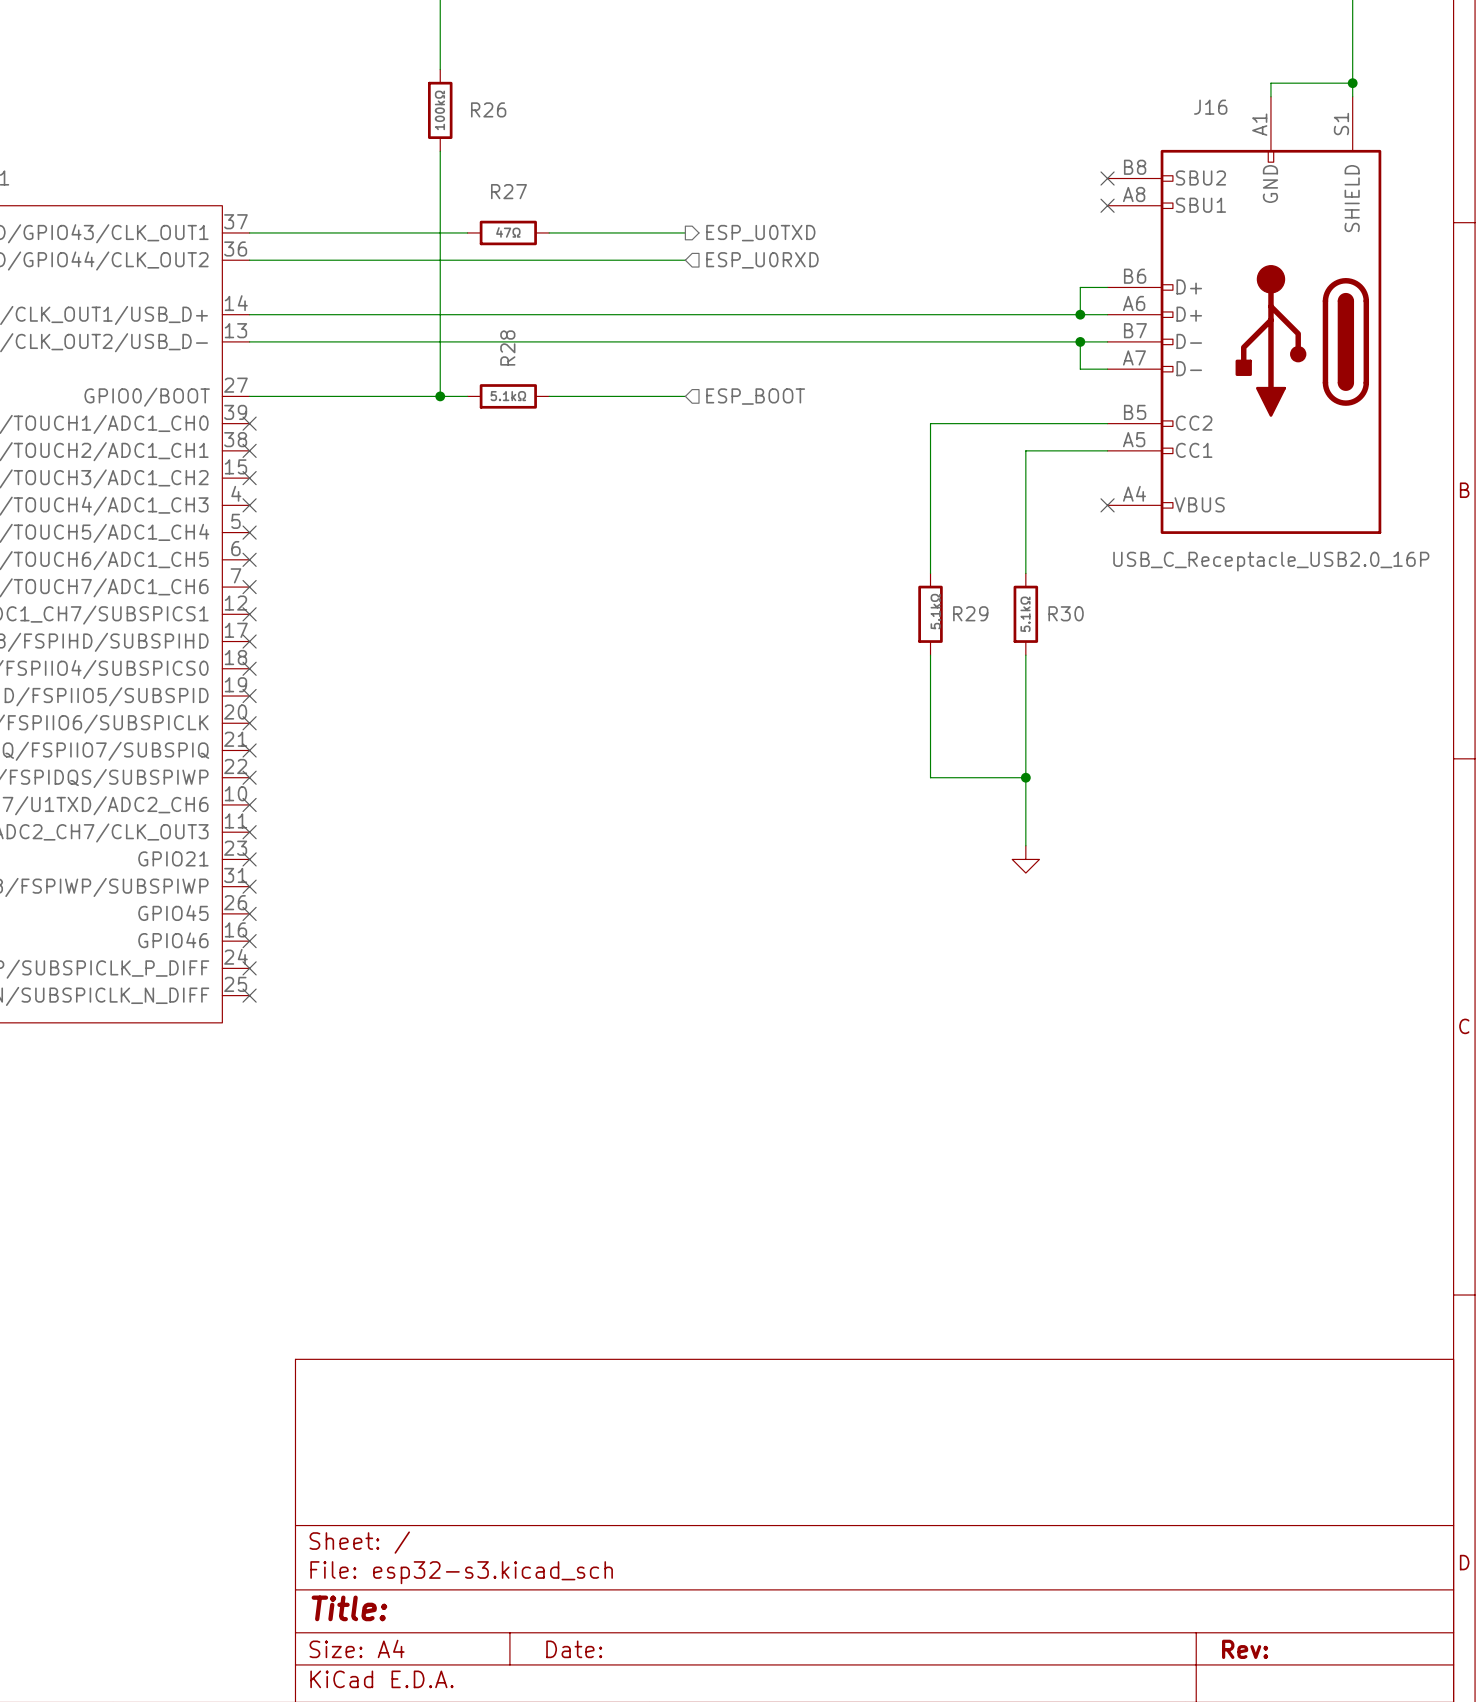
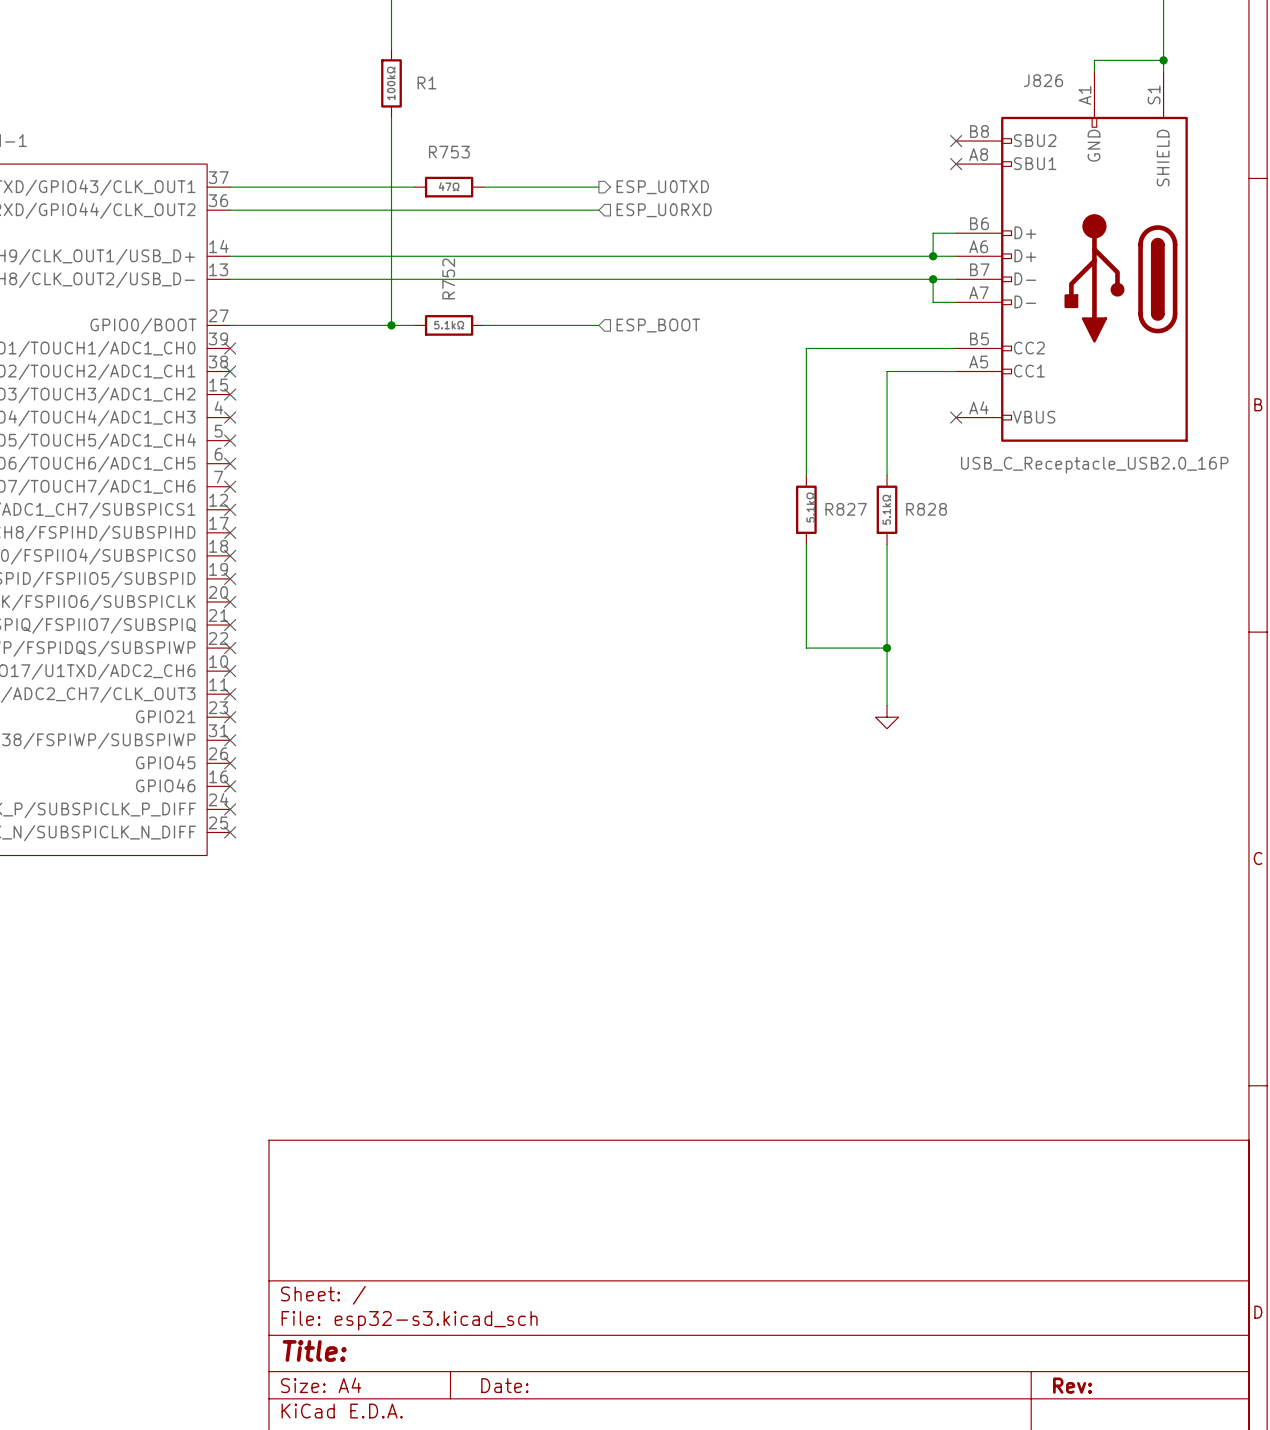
J16 name: J16 (1210, 107) -> J826 (1043, 80)
R26 name: R26 (488, 109) -> R1 (426, 82)
R27 name: R27 (508, 191) -> R753 (449, 152)
R28 name: R28 (507, 347) -> R752 (448, 278)
R29 name: R29 (970, 613) -> R827 (846, 509)
R30 name: R30 (1066, 613) -> R828 (926, 509)

